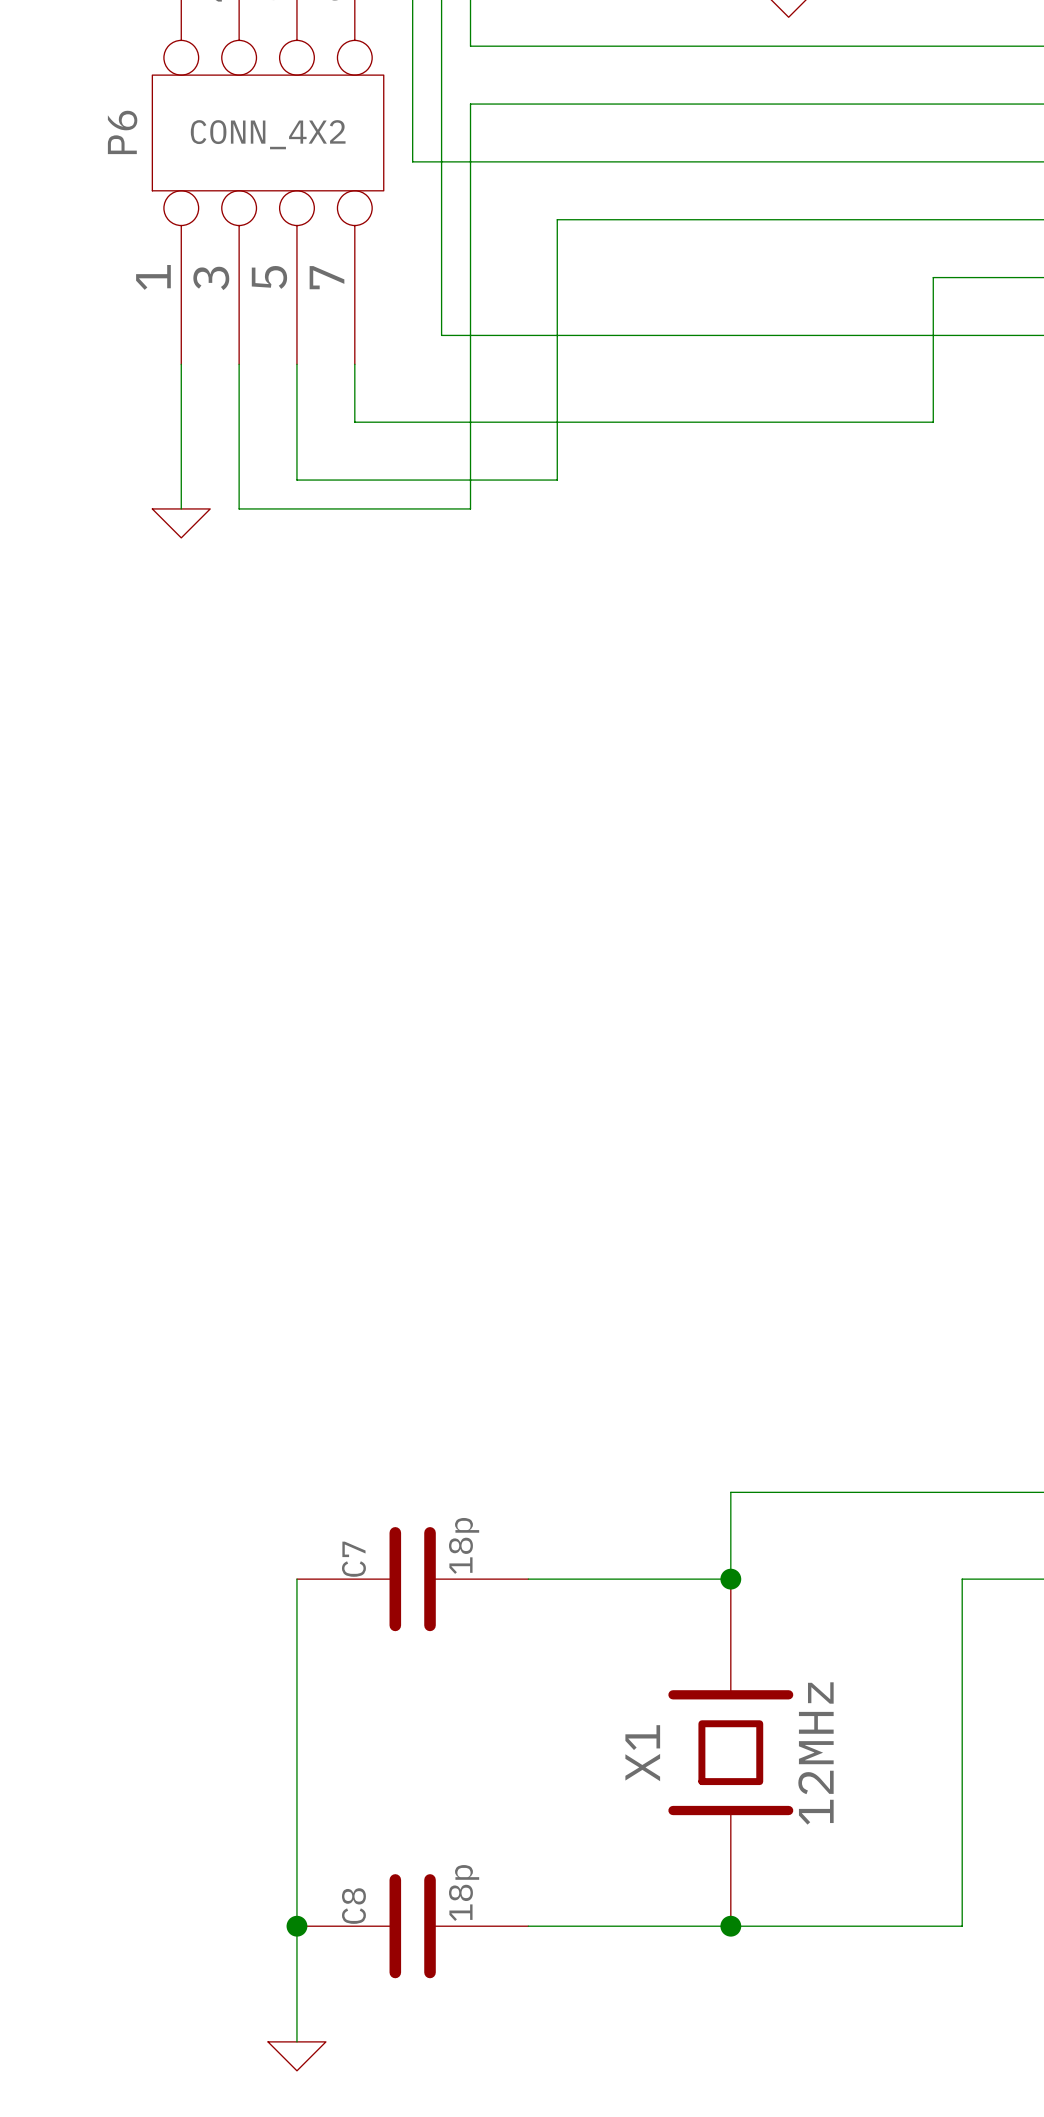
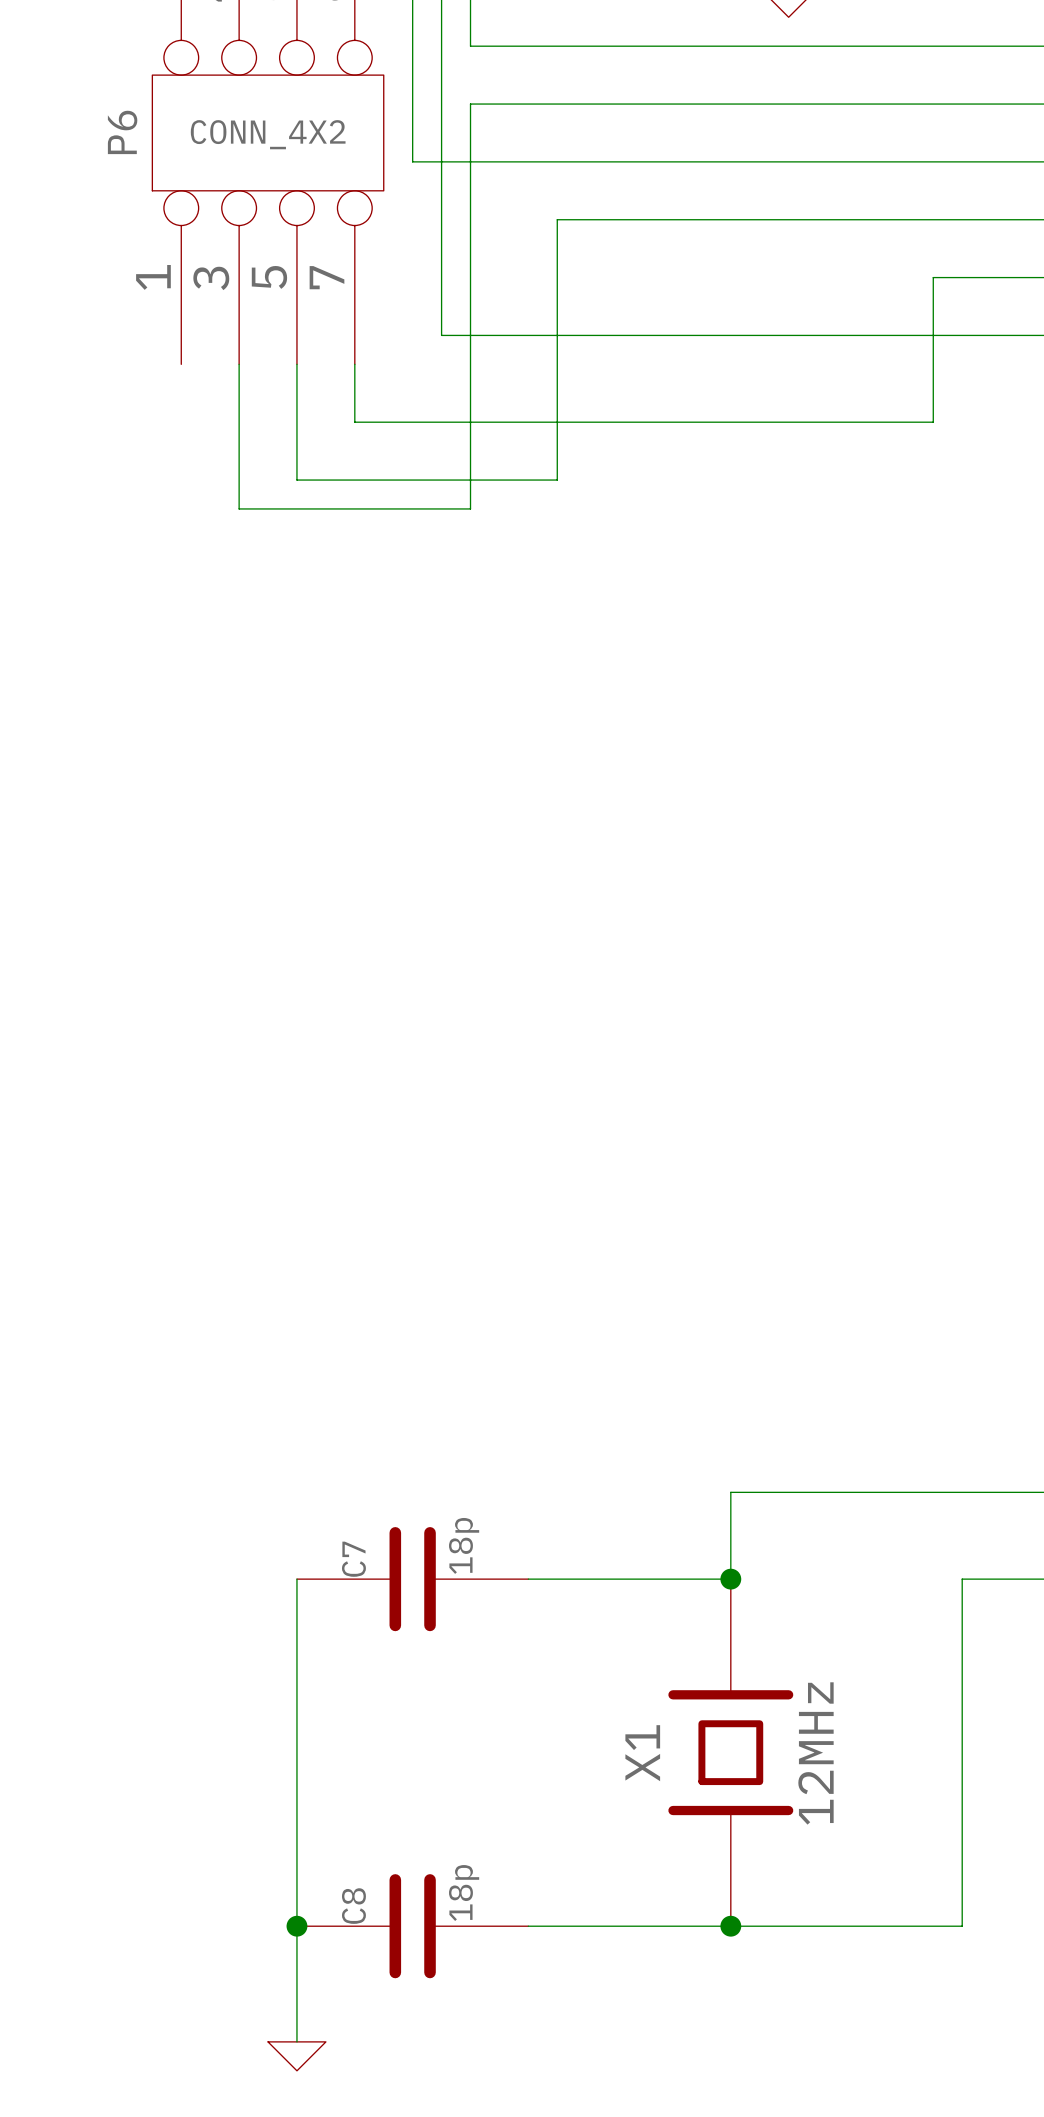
wire: (181, 364) (181, 508) -> none
power symbol: (181, 523) -> none

